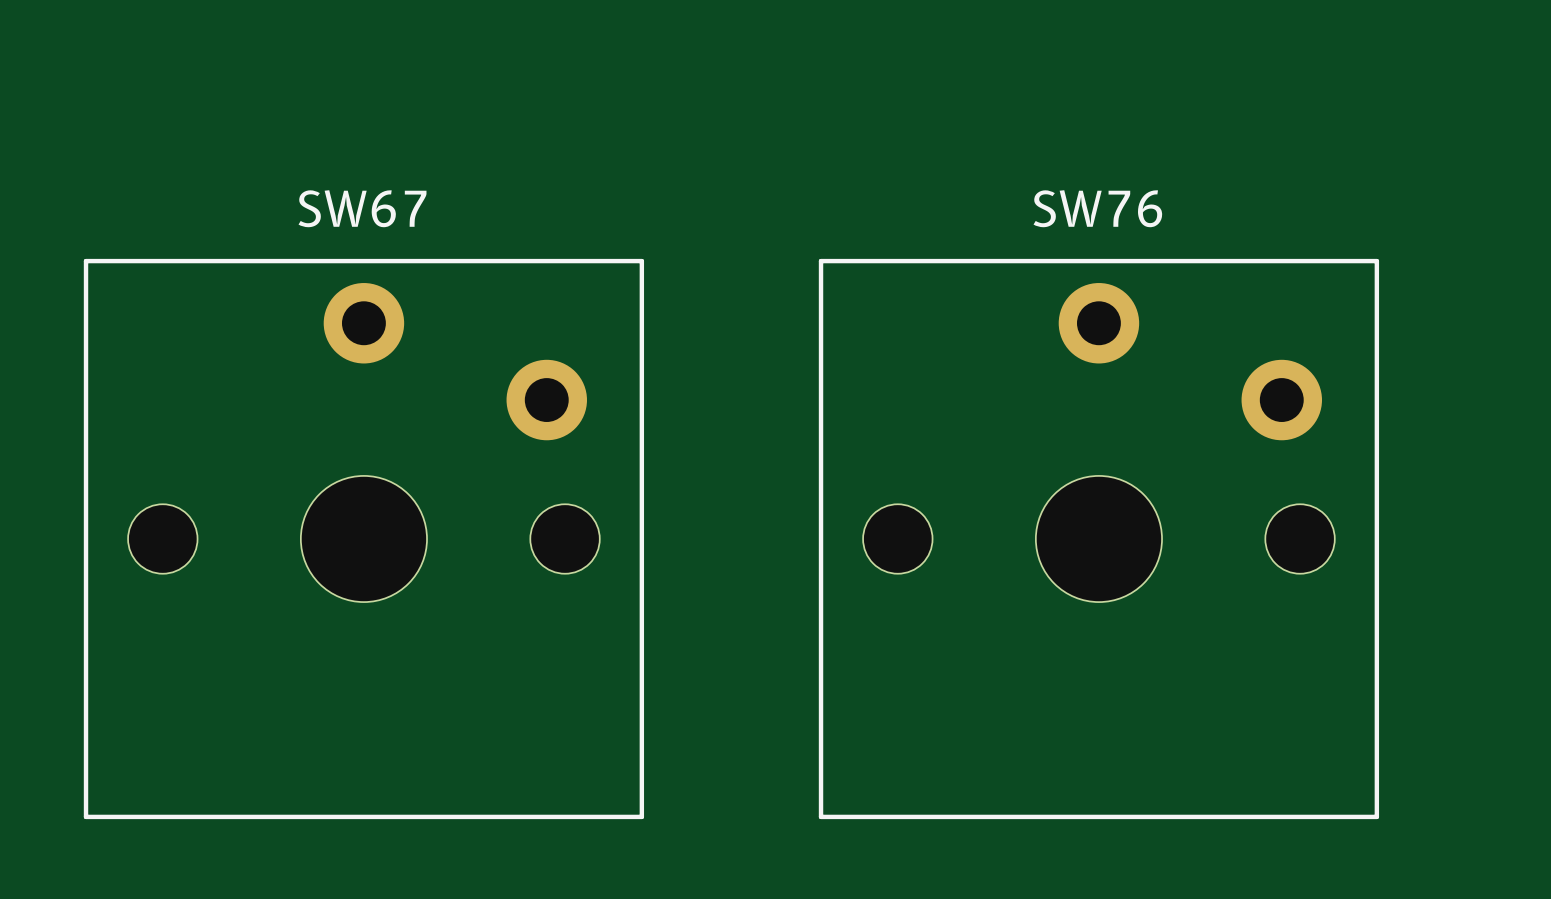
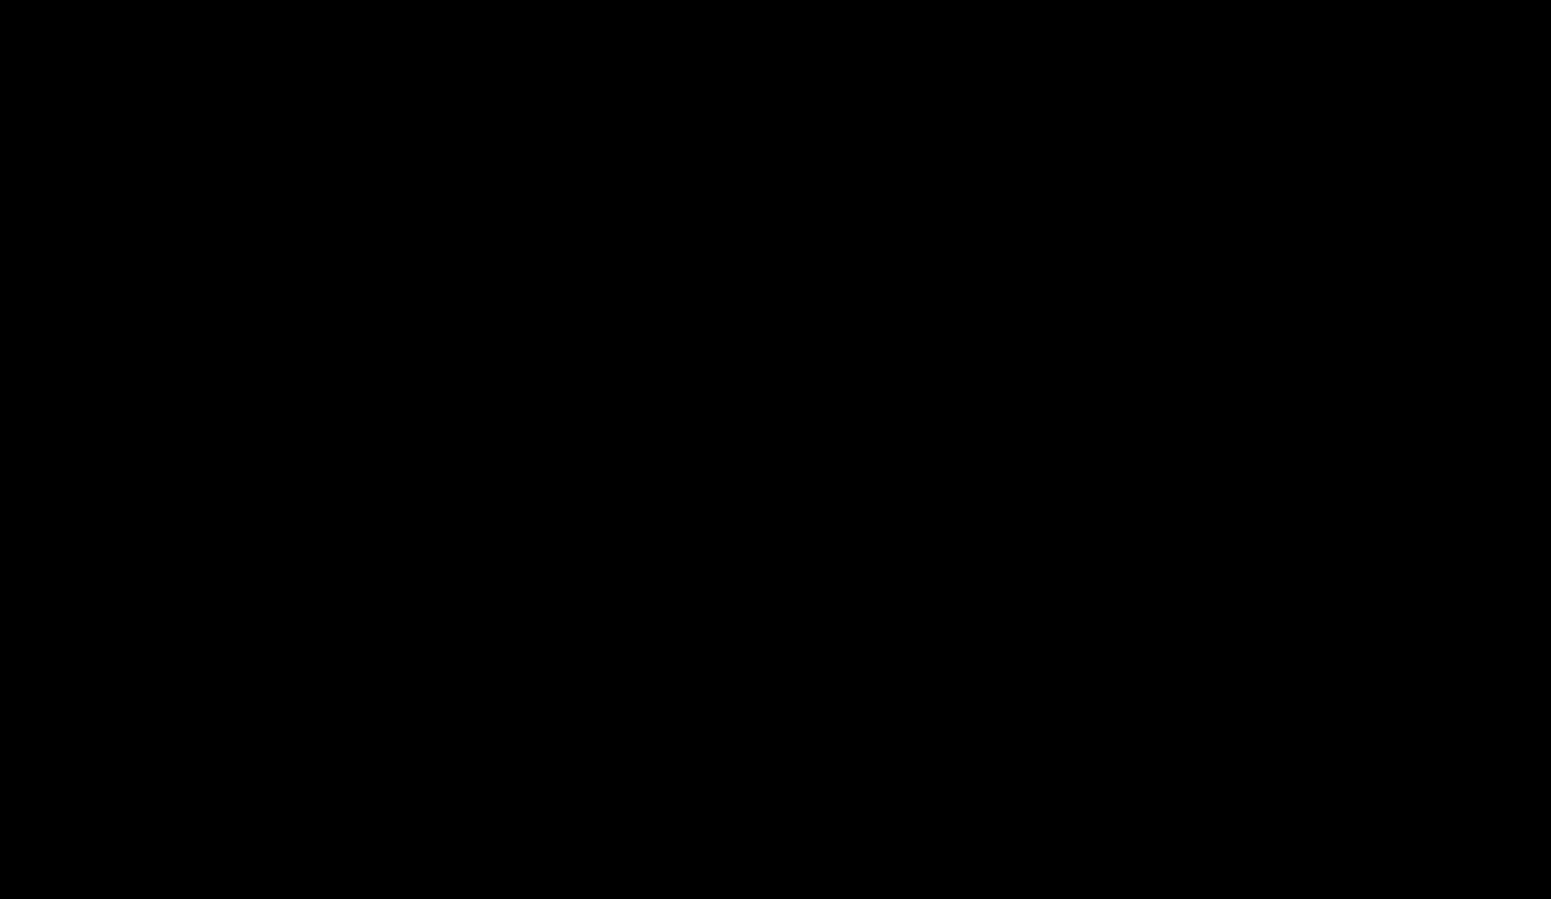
SW67: (363, 538) -> none
SW76: (1098, 538) -> none

